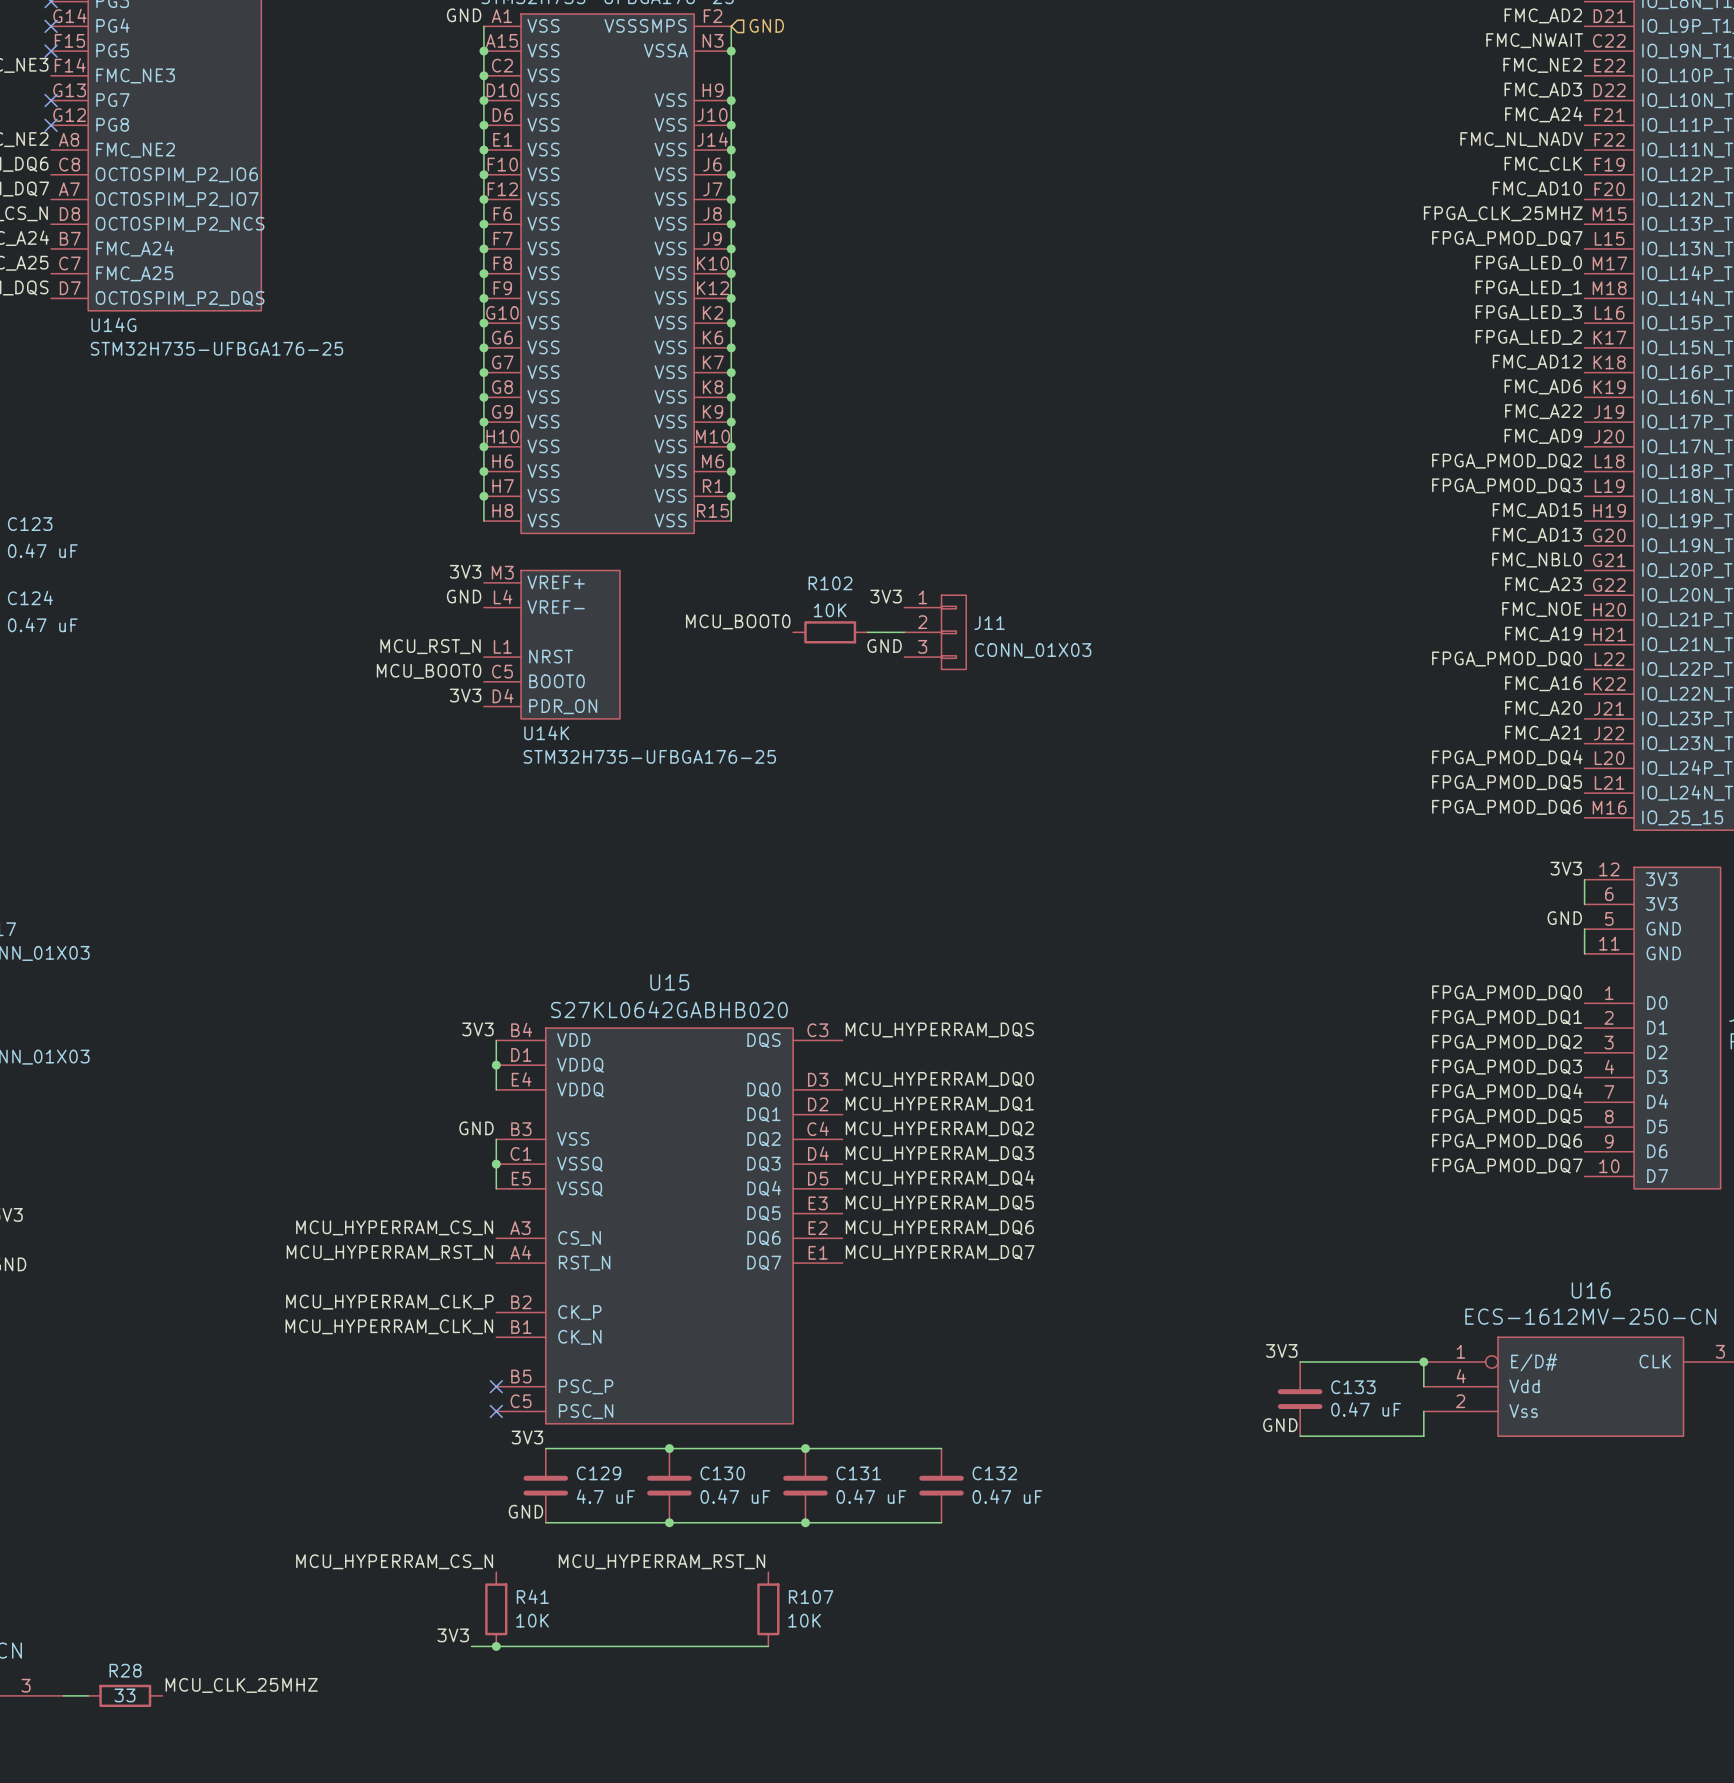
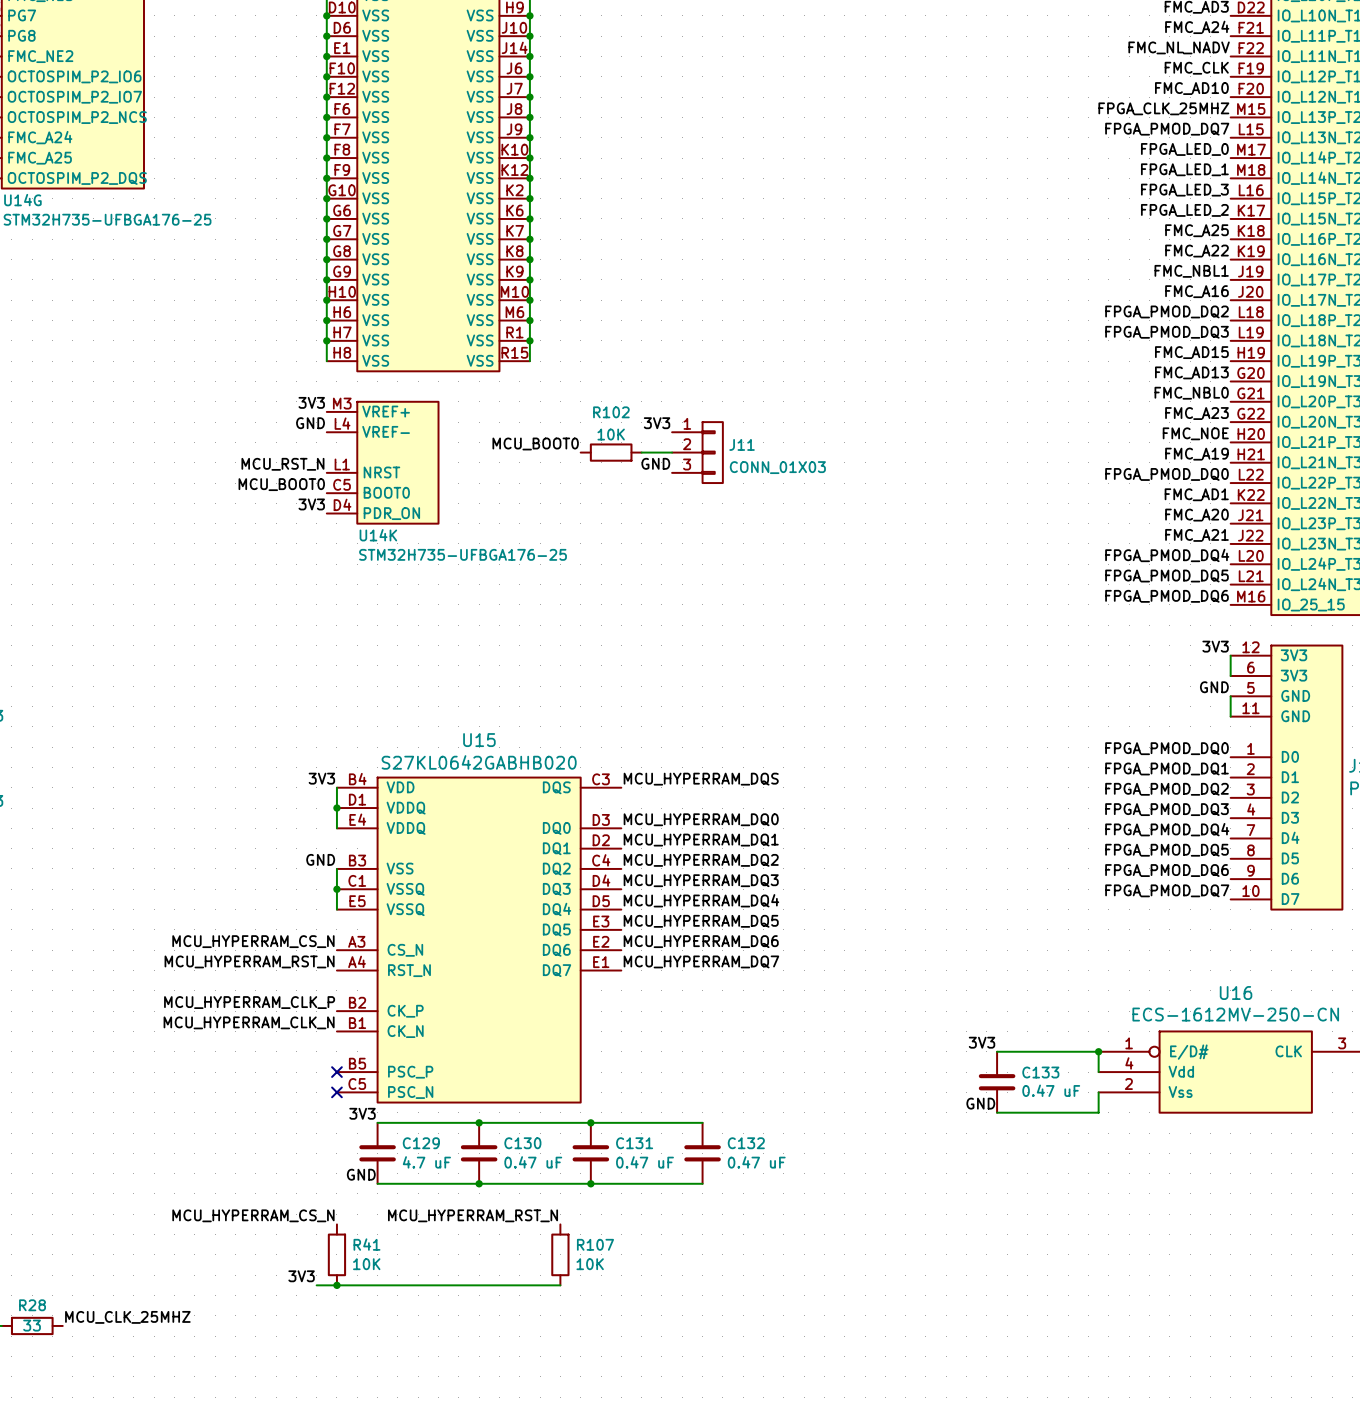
label: FMC_AD12 (1537, 362) -> FMC_A25 (1196, 230)
label: FMC_AD6 (1543, 386) -> FMC_A22 (1196, 251)
label: FMC_A22 (1543, 411) -> FMC_NBL1 (1191, 271)
label: FMC_AD9 (1543, 436) -> FMC_A16 (1196, 291)
label: FMC_A16 (1543, 683) -> FMC_AD1 (1196, 494)

